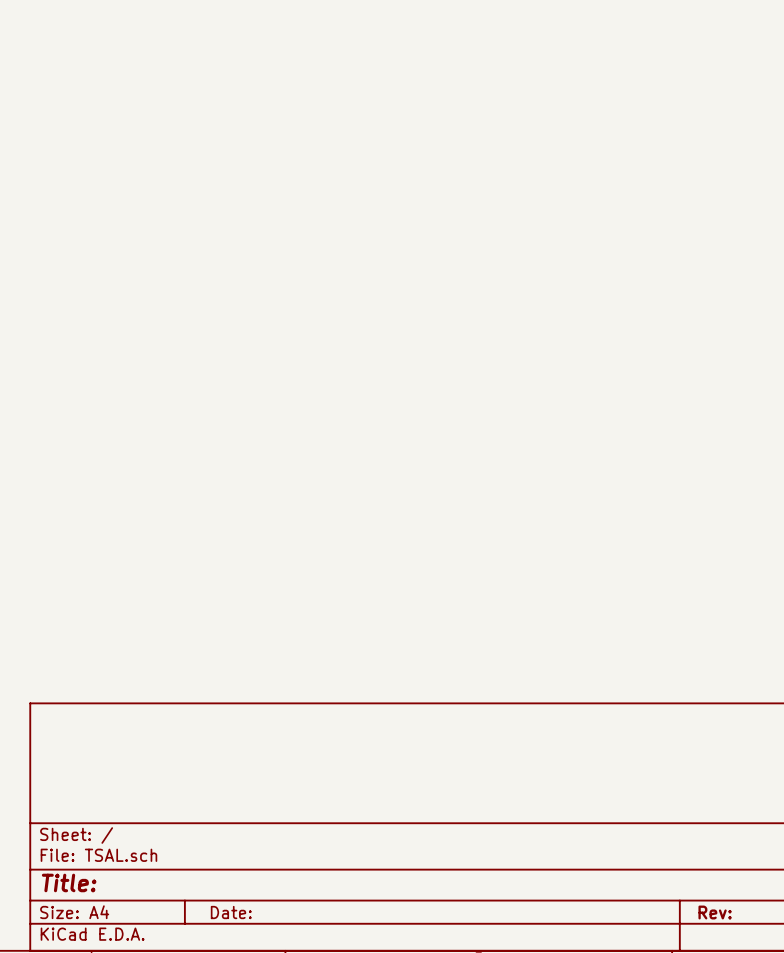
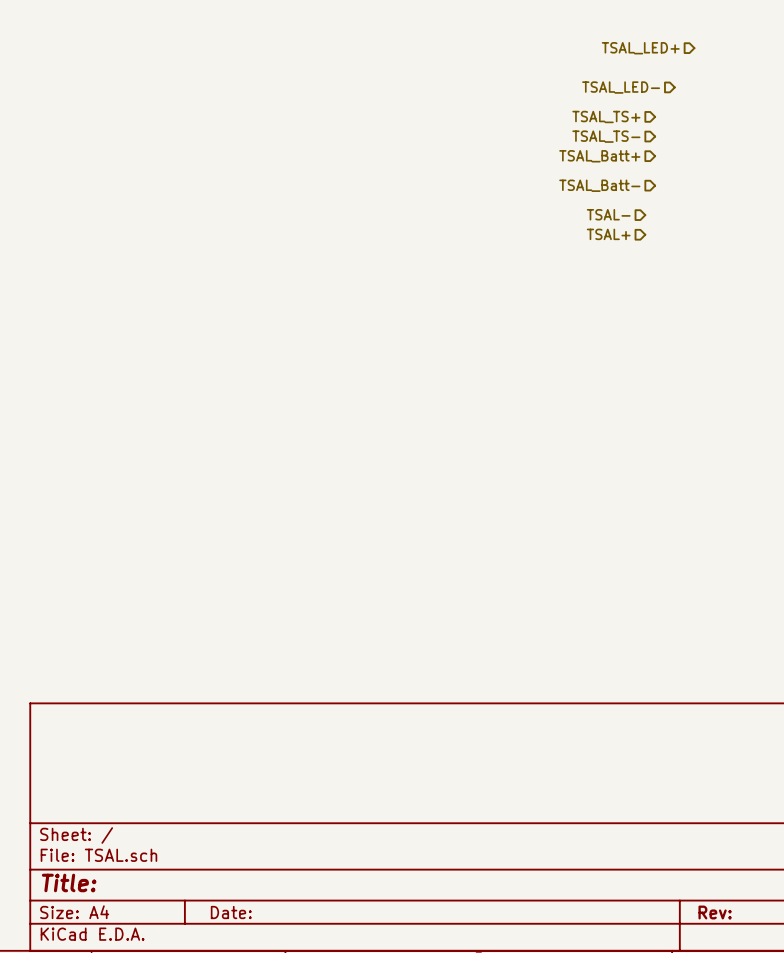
hierarchical label: none -> TSAL_LED+ (640, 48)
hierarchical label: none -> TSAL_LED- (621, 87)
hierarchical label: none -> TSAL_TS+ (606, 116)
hierarchical label: none -> TSAL_TS- (606, 136)
hierarchical label: none -> TSAL_Batt+ (599, 156)
hierarchical label: none -> TSAL_Batt- (599, 185)
hierarchical label: none -> TSAL- (608, 214)
hierarchical label: none -> TSAL+ (608, 234)

